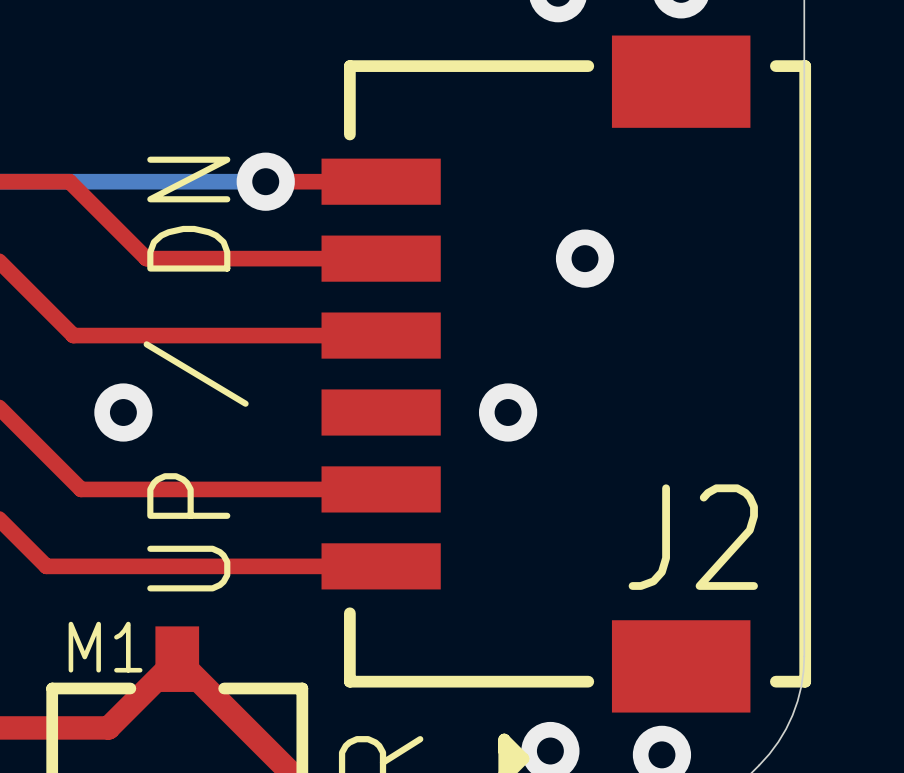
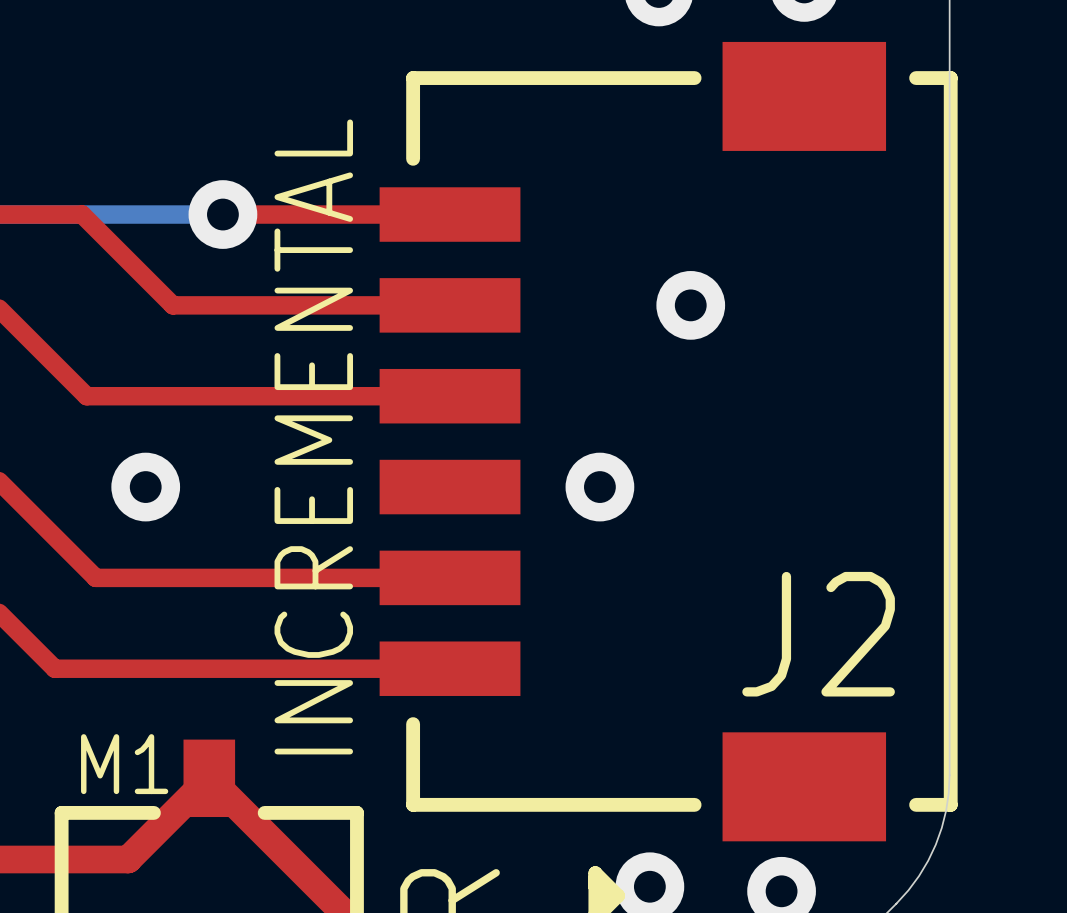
top track: none -> (222, 214) (313, 214)
bottom track: (188, 181) (265, 181) -> none
via position: (265, 181) -> (222, 214)
text: UP / DN (196, 374) -> INCREMENTAL (313, 436)

